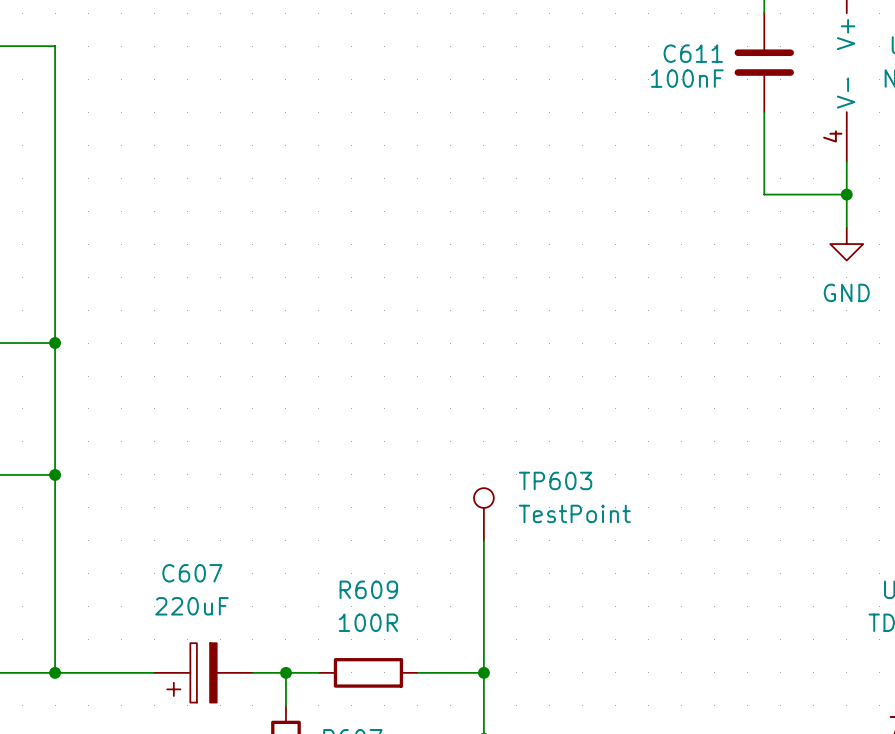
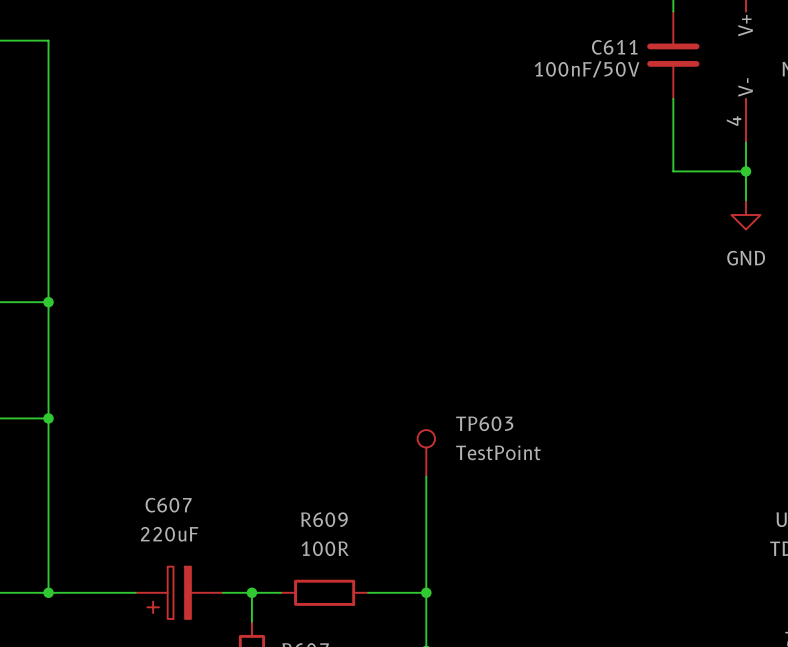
C611 value: 100nF (687, 78) -> 100nF/50V (587, 69)

